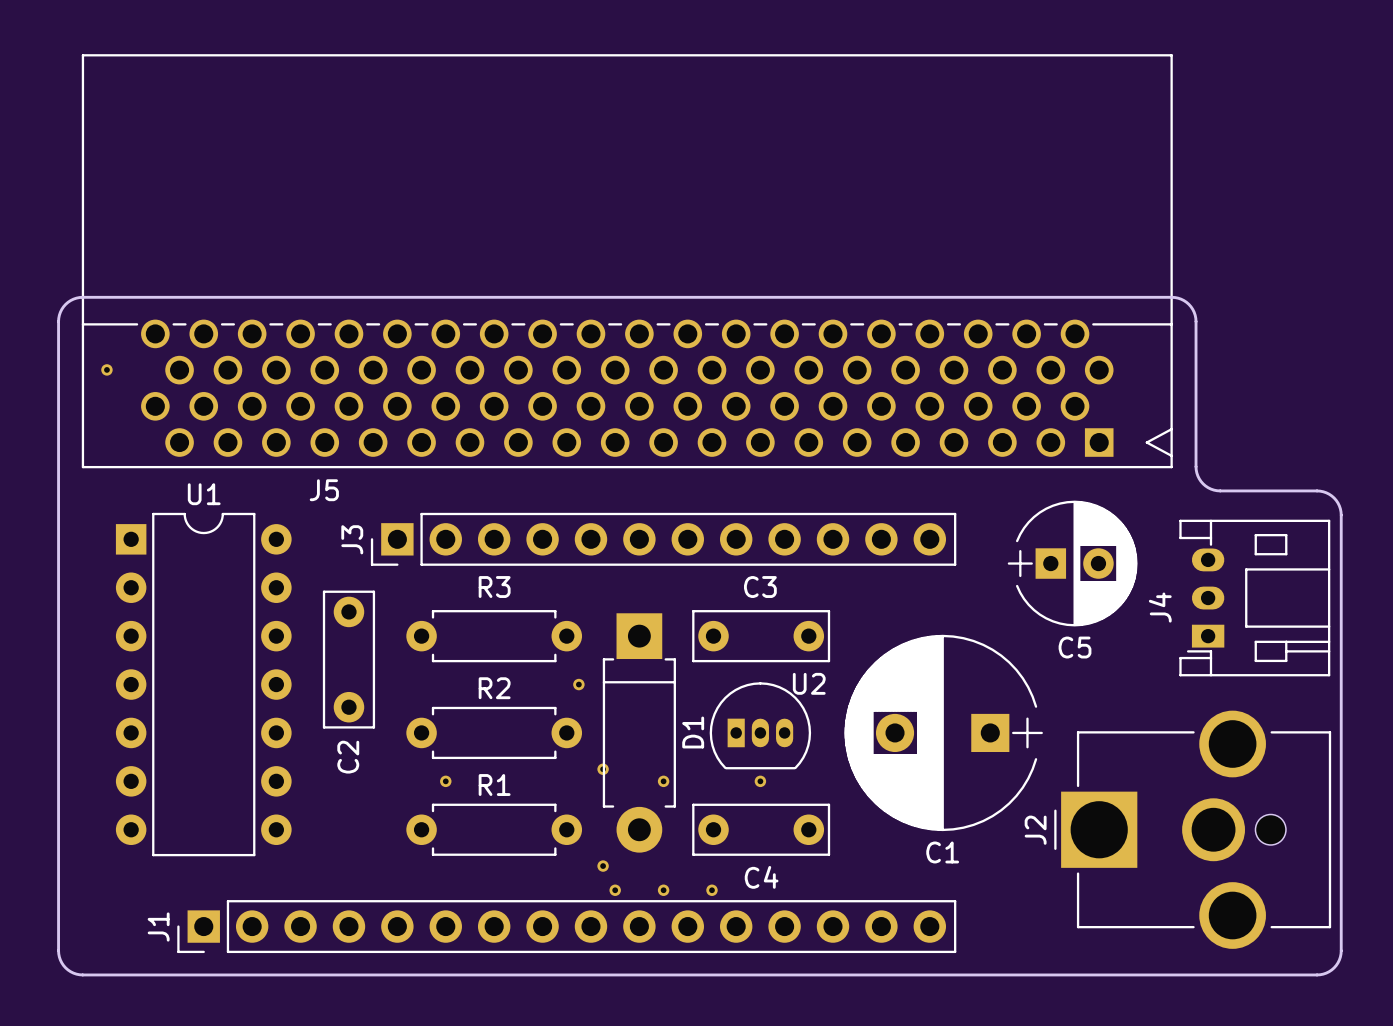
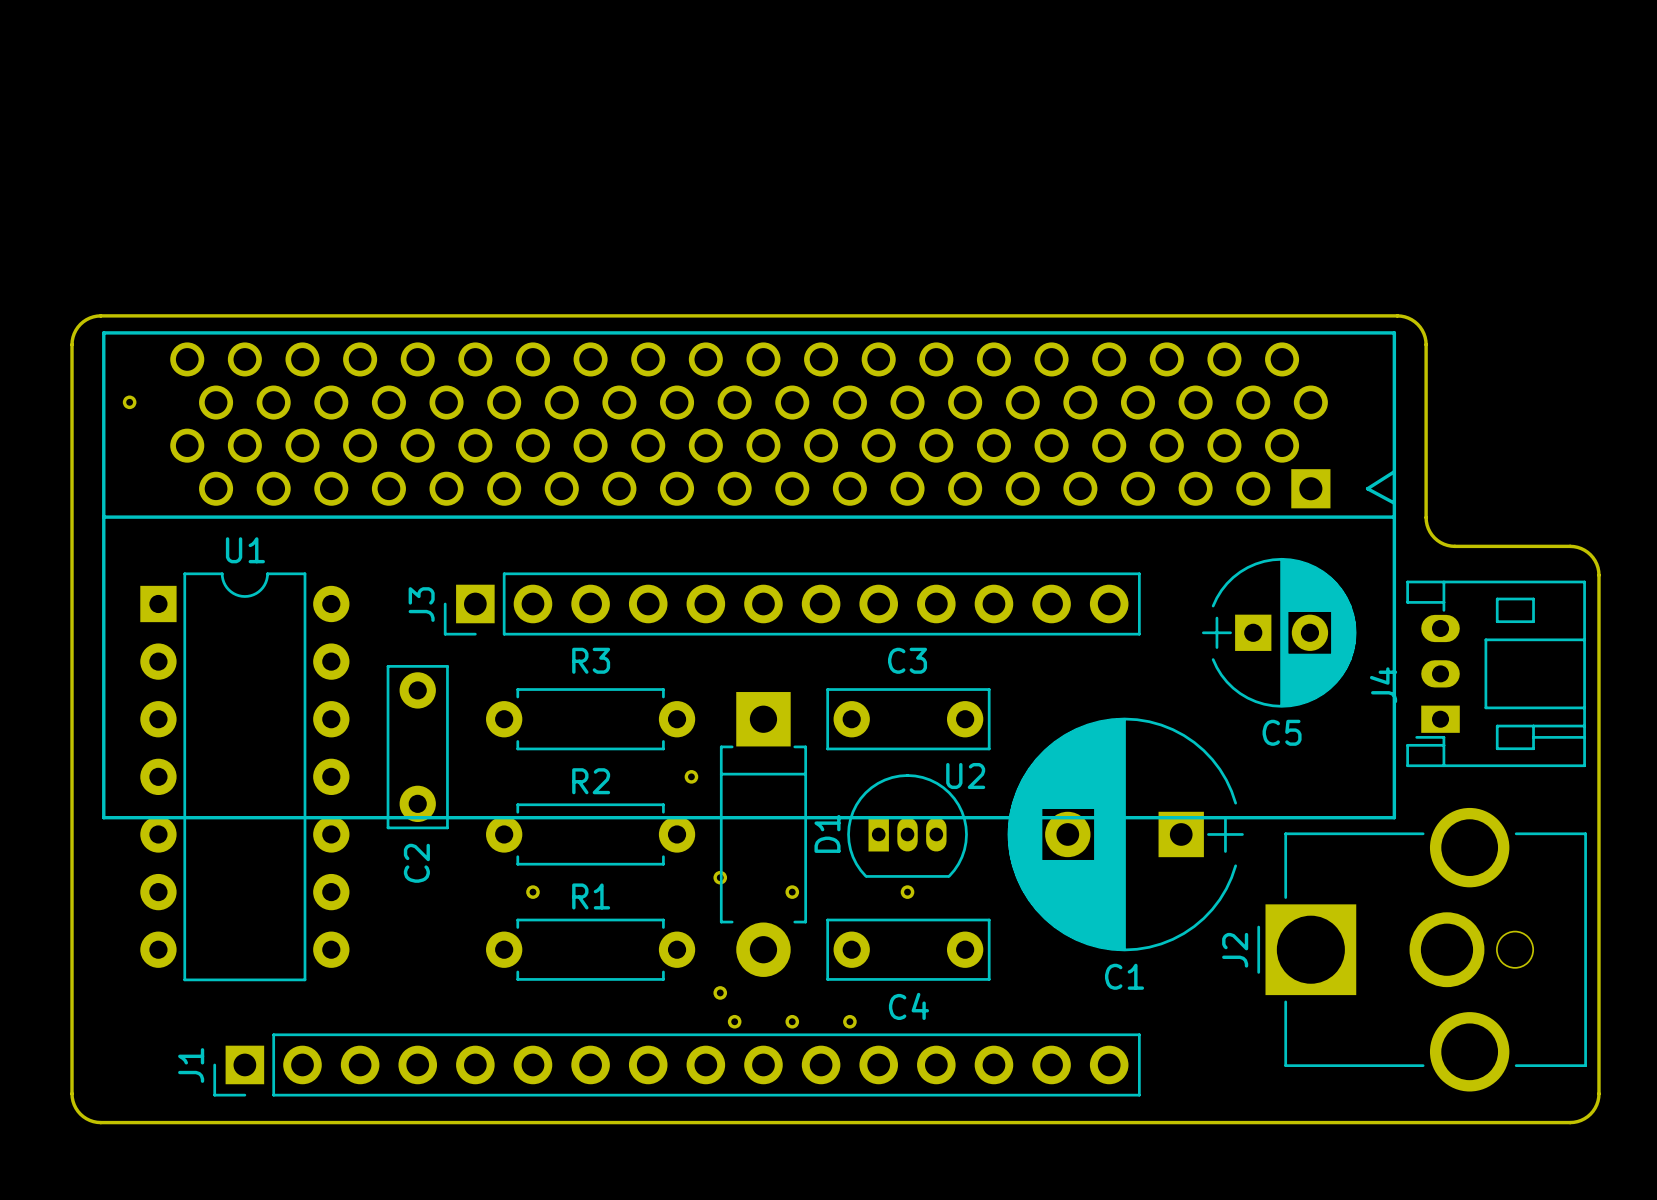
J5: (627, 261) -> none
part: none -> (749, 575)

